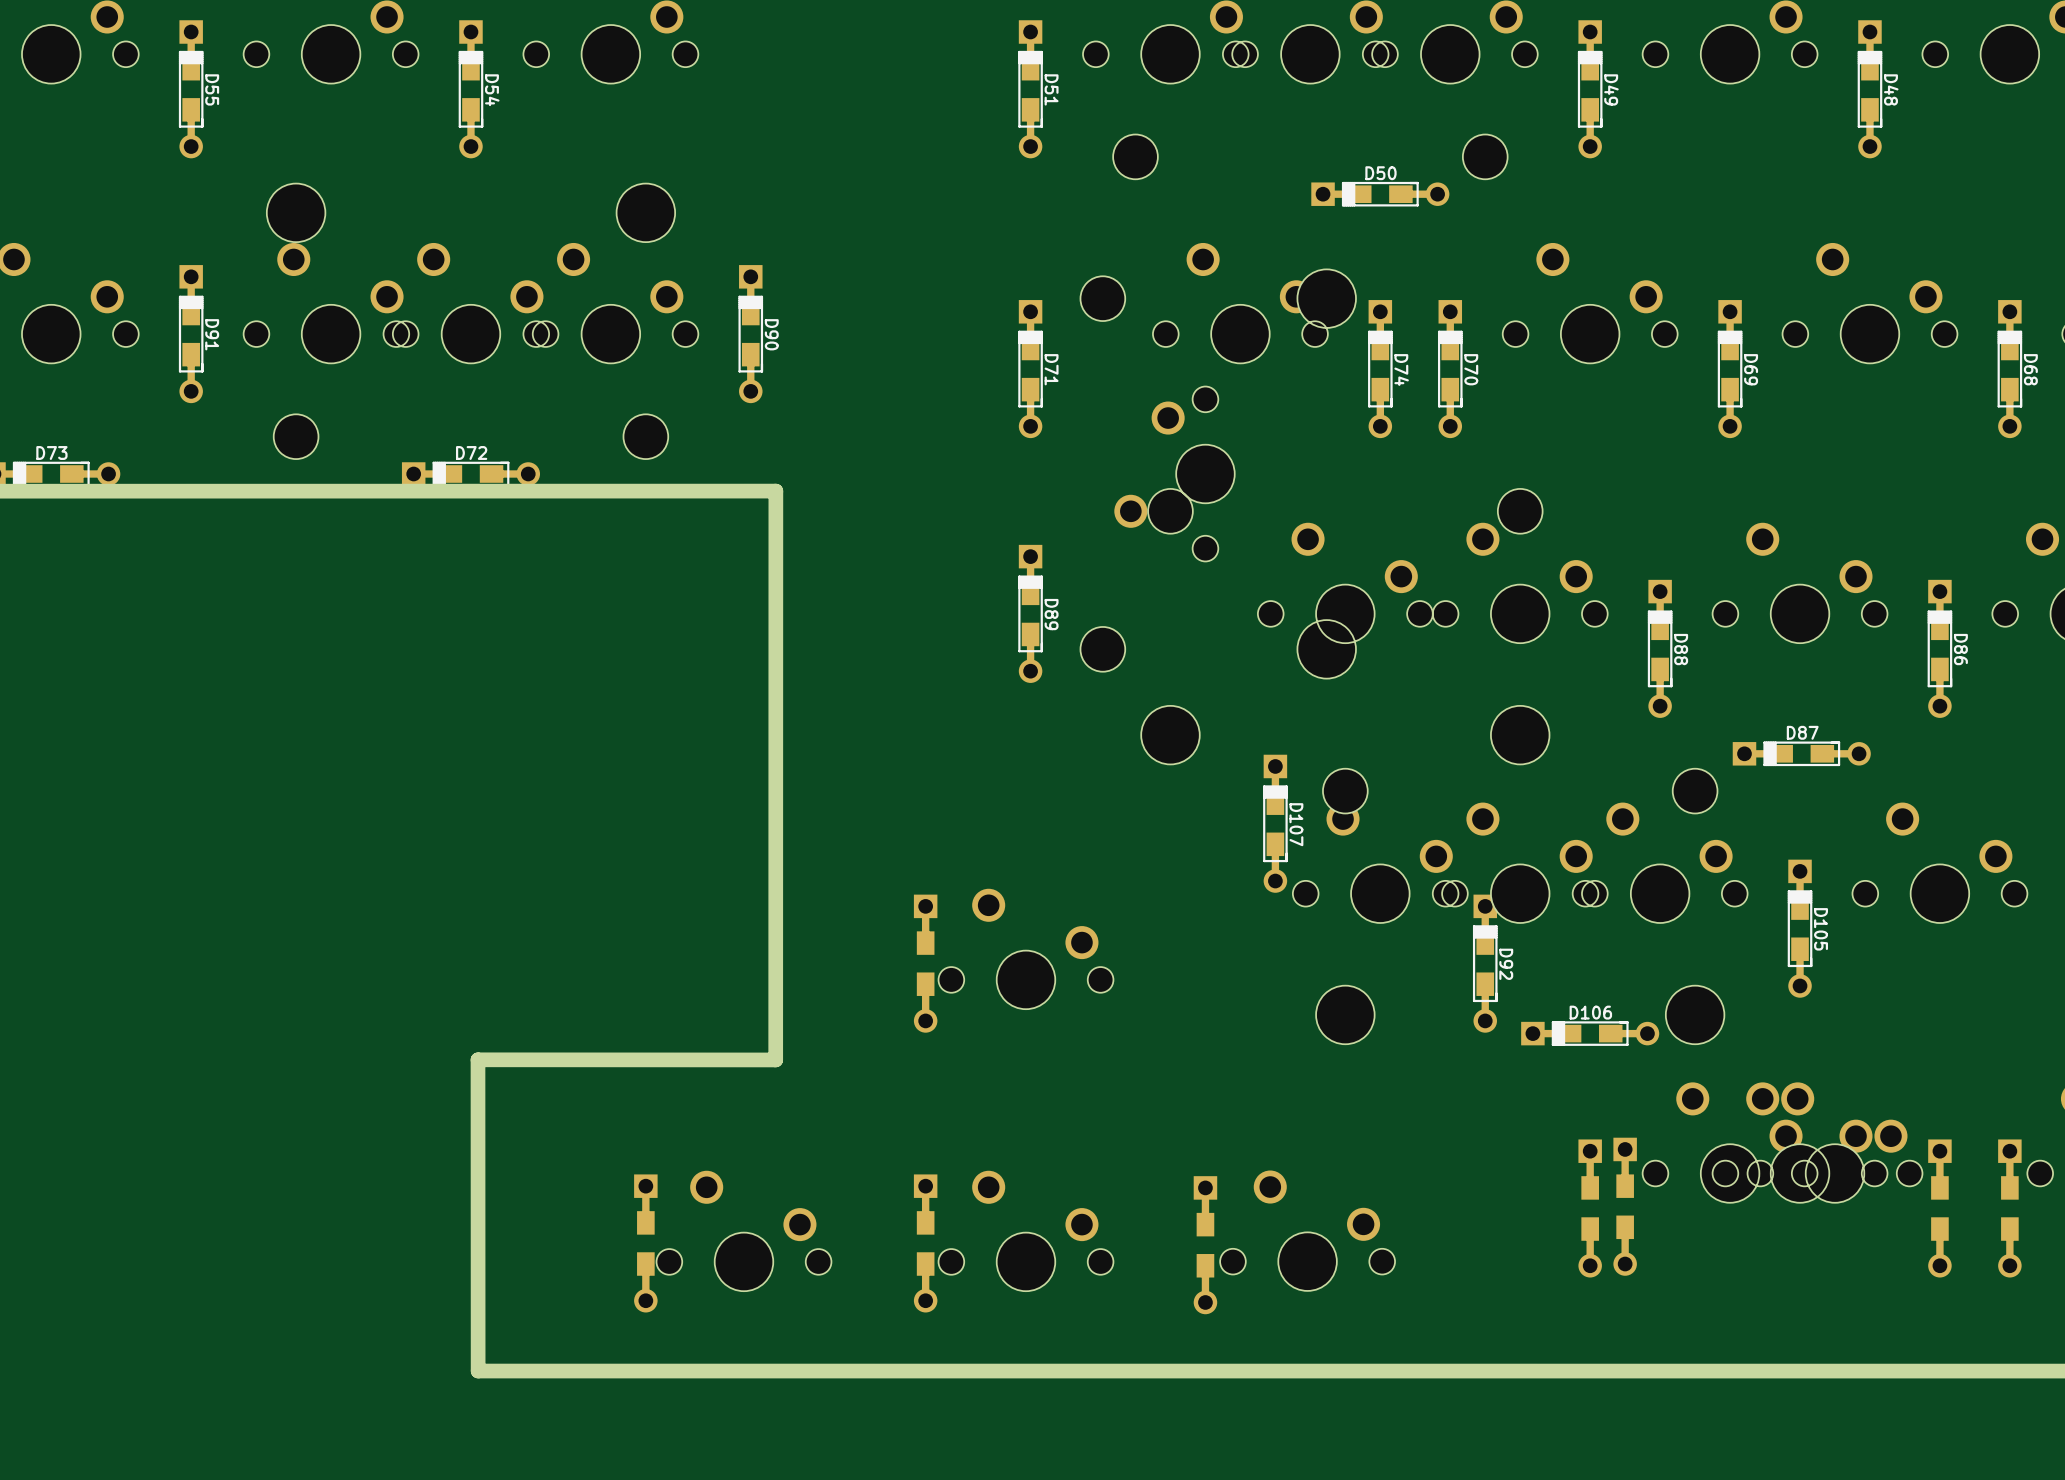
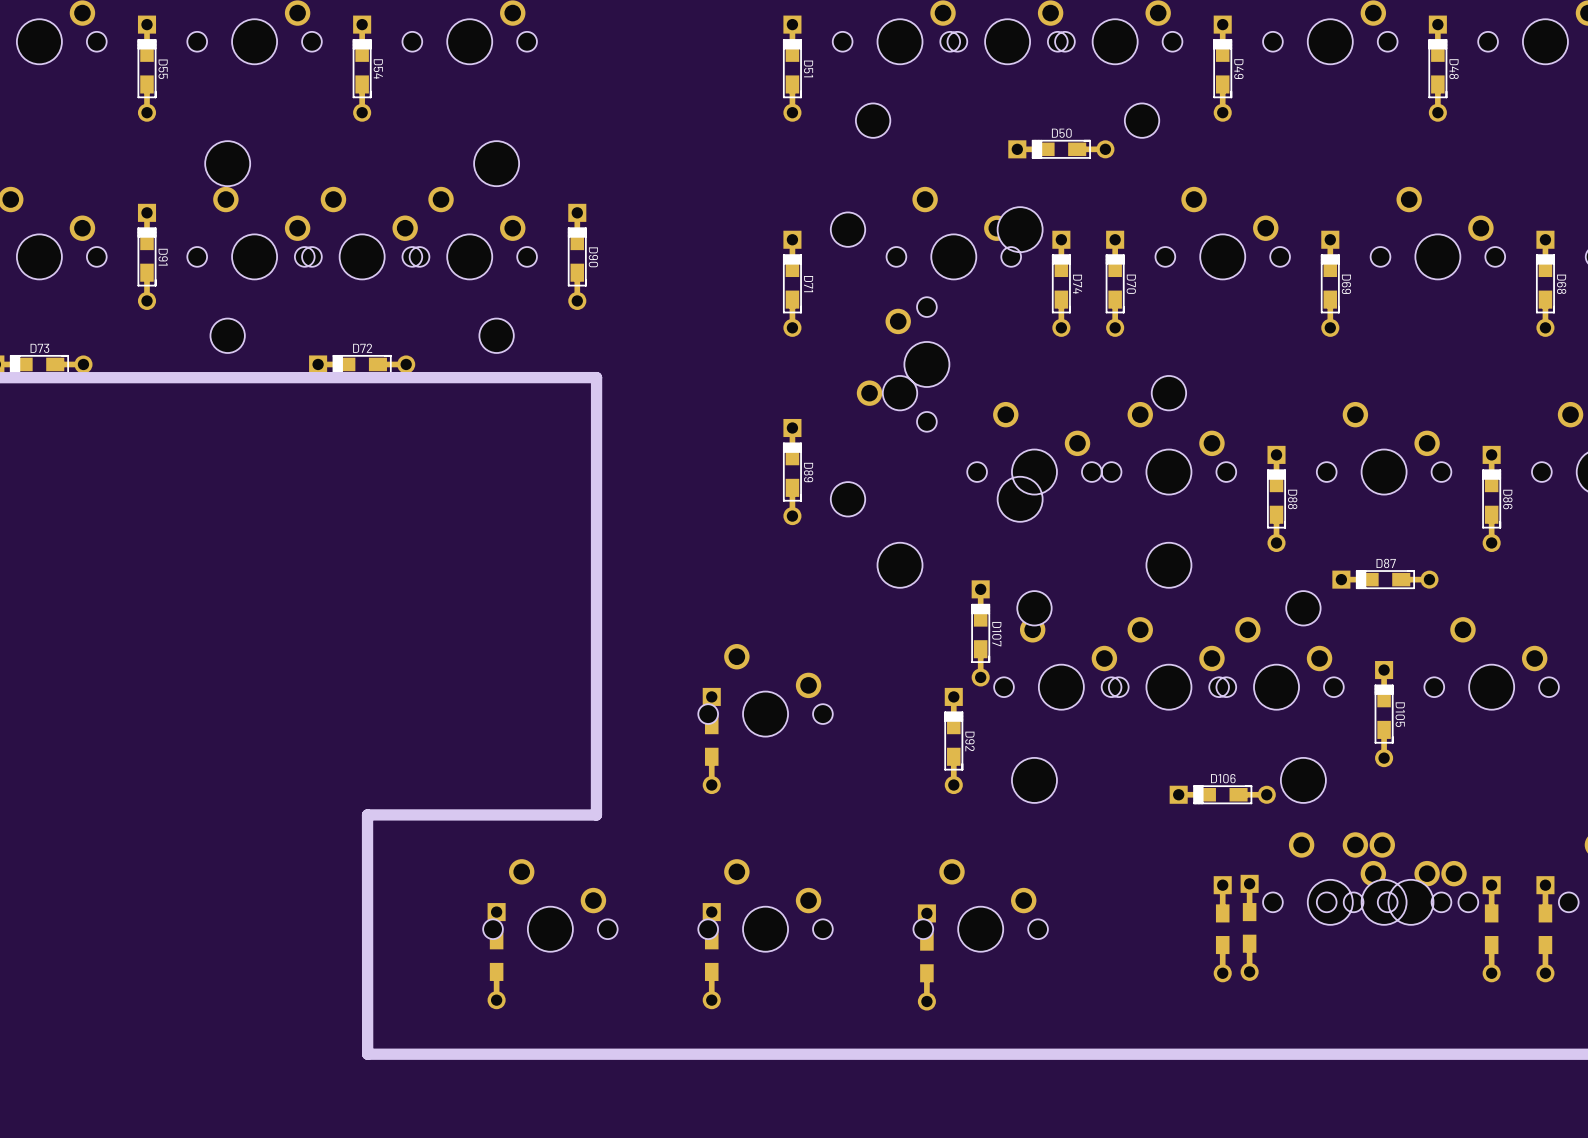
part position: (1025, 948) -> (765, 690)
D92 position: (1485, 963) -> (953, 740)
part position: (743, 1230) -> (550, 905)
part position: (1025, 1230) -> (765, 905)
part position: (1307, 1230) -> (980, 905)

